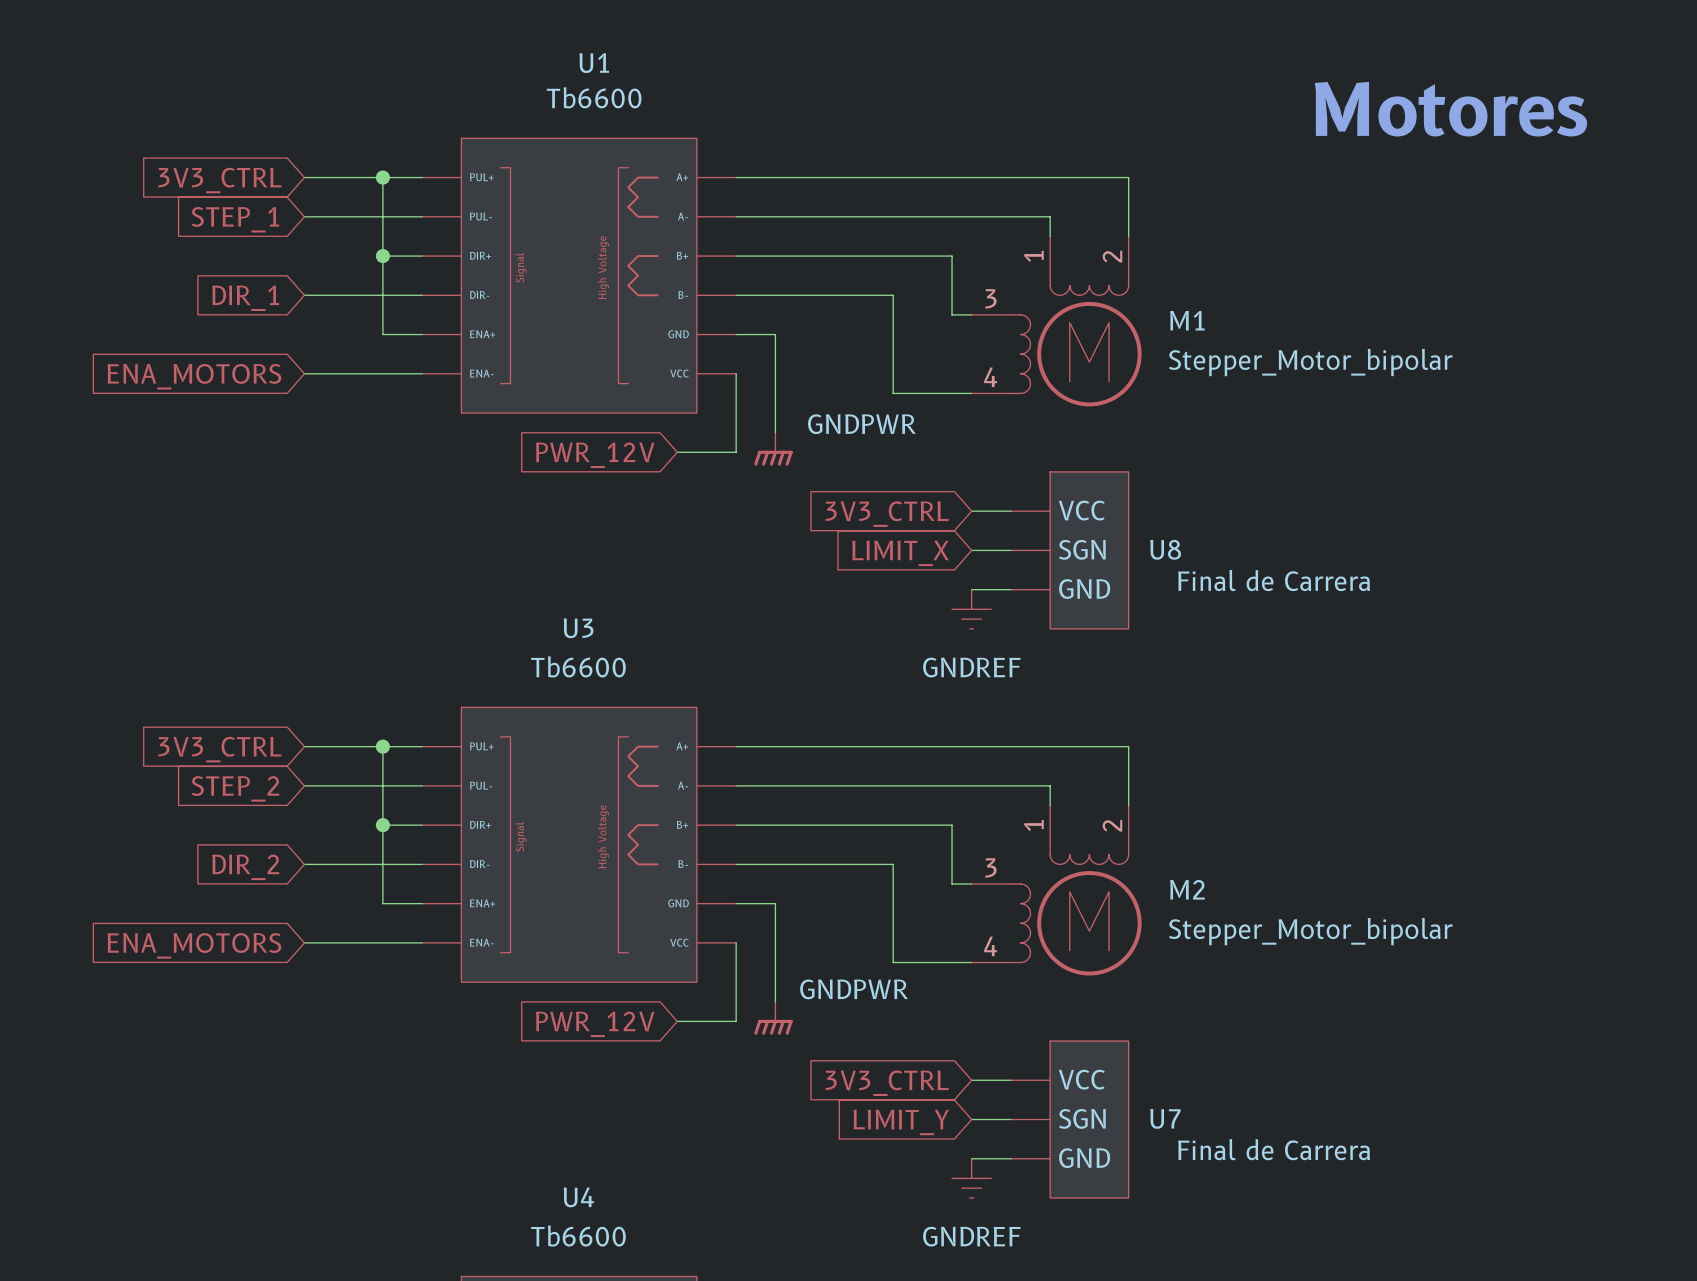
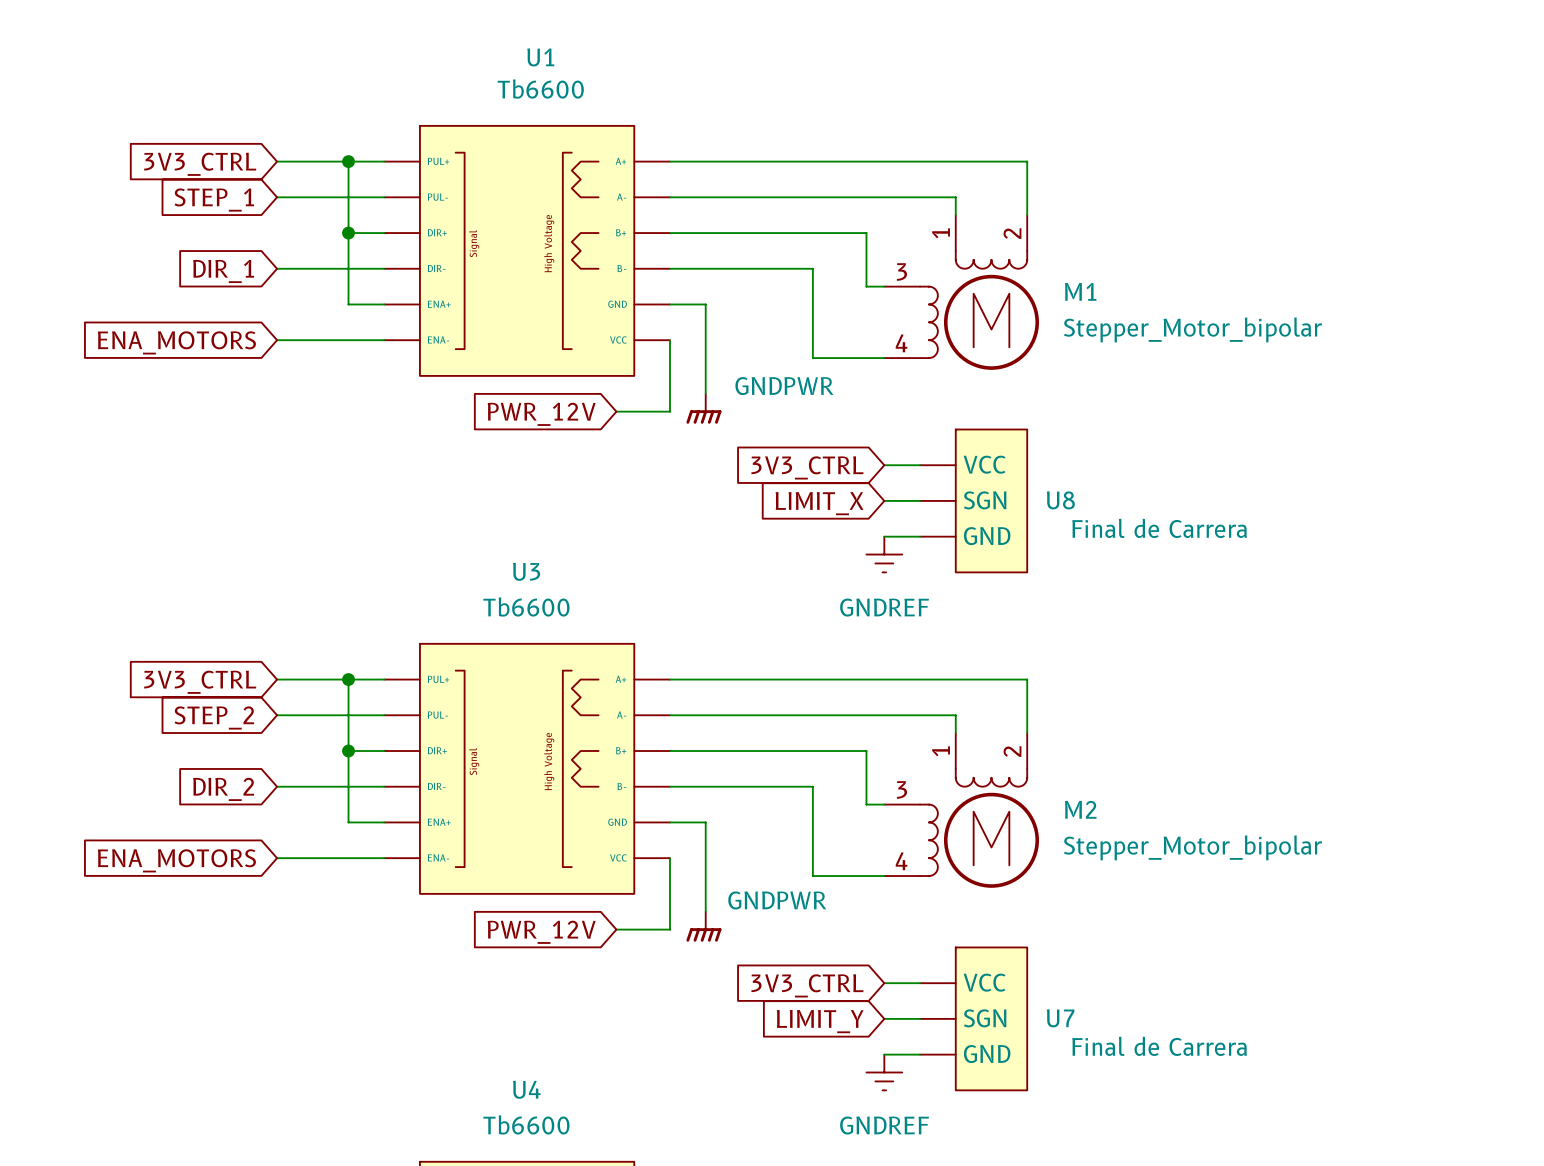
text: Motores (1450, 109) -> none

